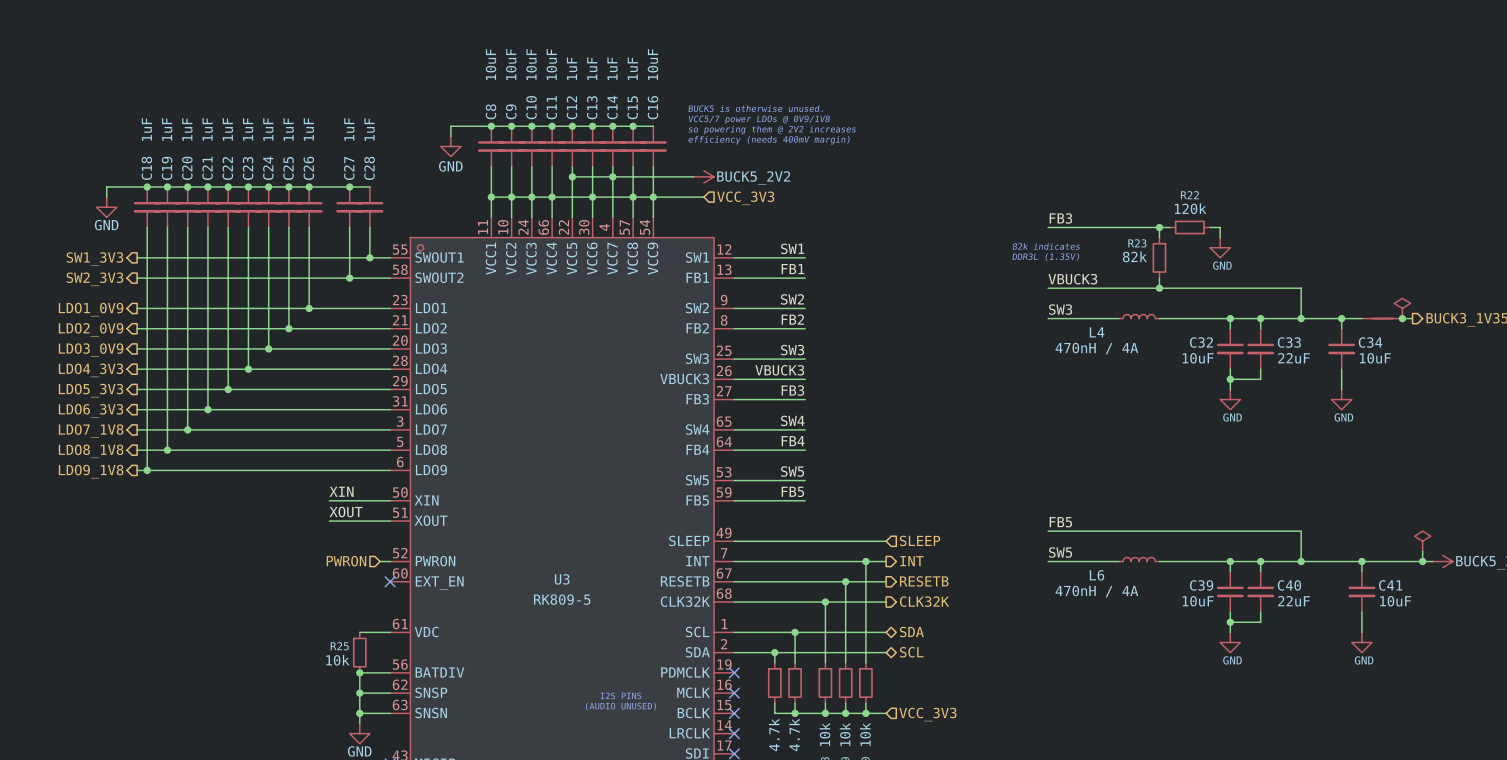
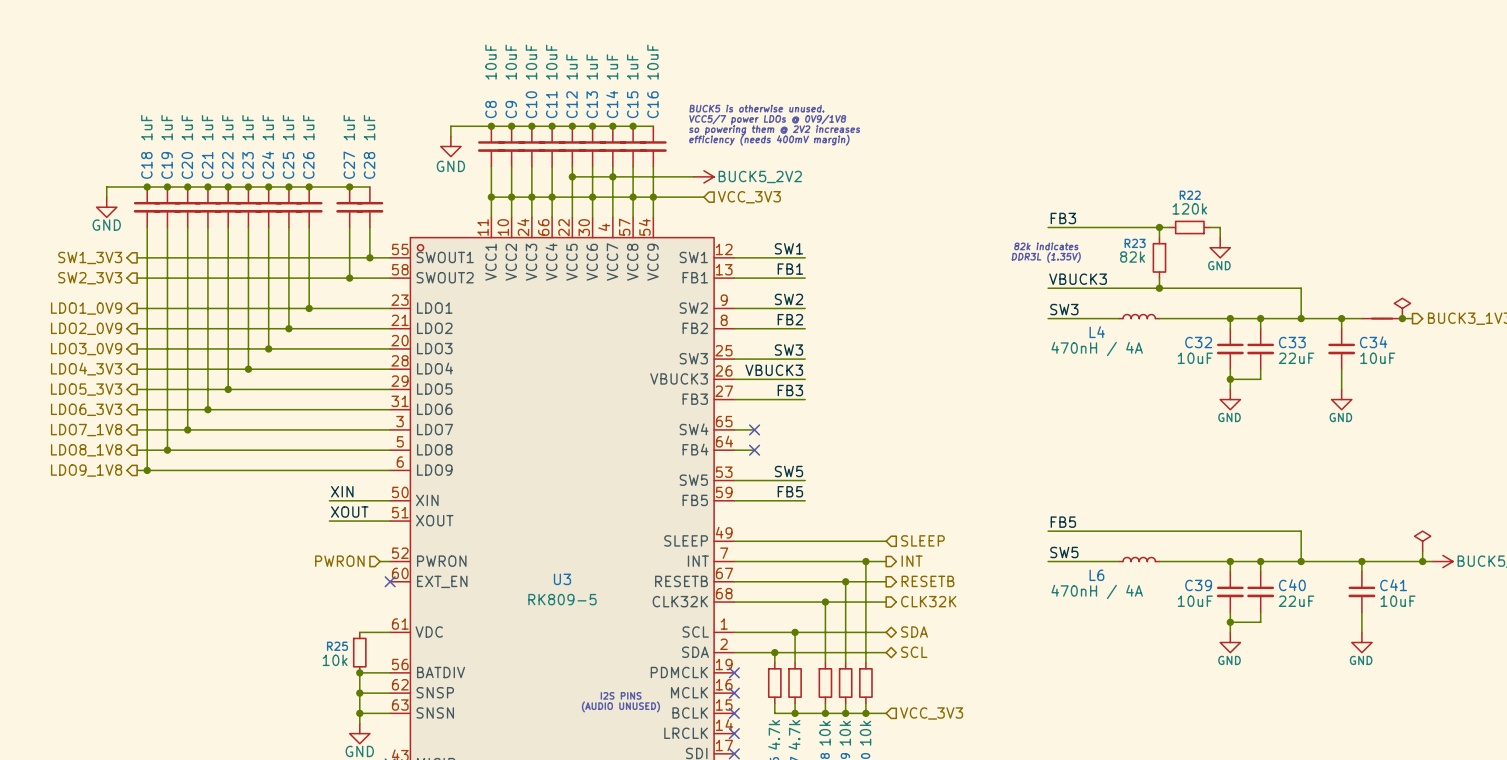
label: SW4 (792, 420) -> none
wire: (754, 429) (805, 429) -> none
no-connect mark: none -> (754, 429)
label: FB4 (793, 441) -> none
wire: (754, 450) (805, 450) -> none
no-connect mark: none -> (754, 450)

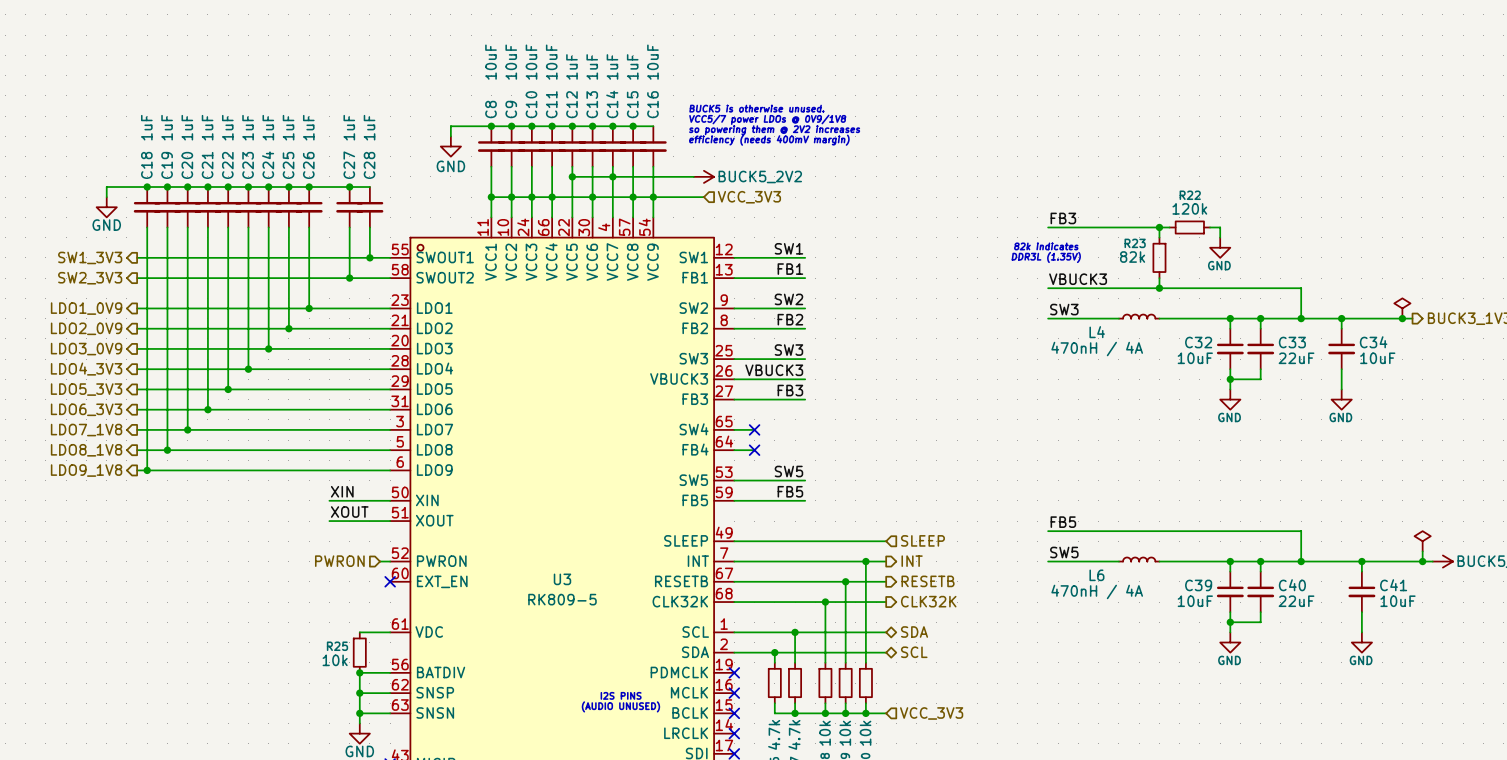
part: (1382, 318) -> none

